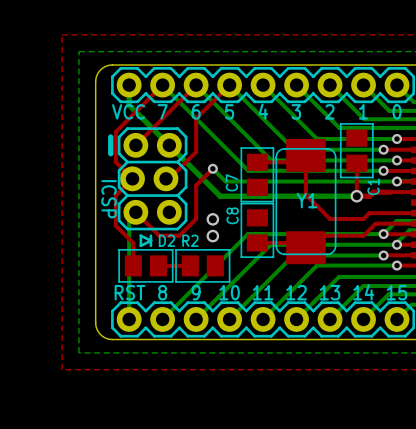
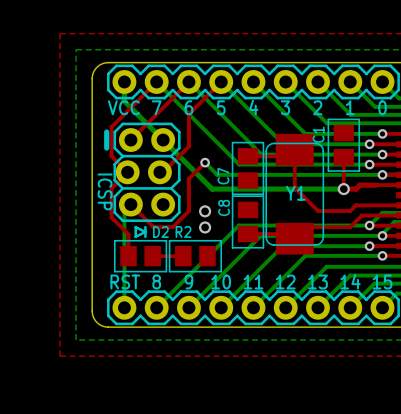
C1 name position: C1 (373, 186) -> C1 (318, 134)

